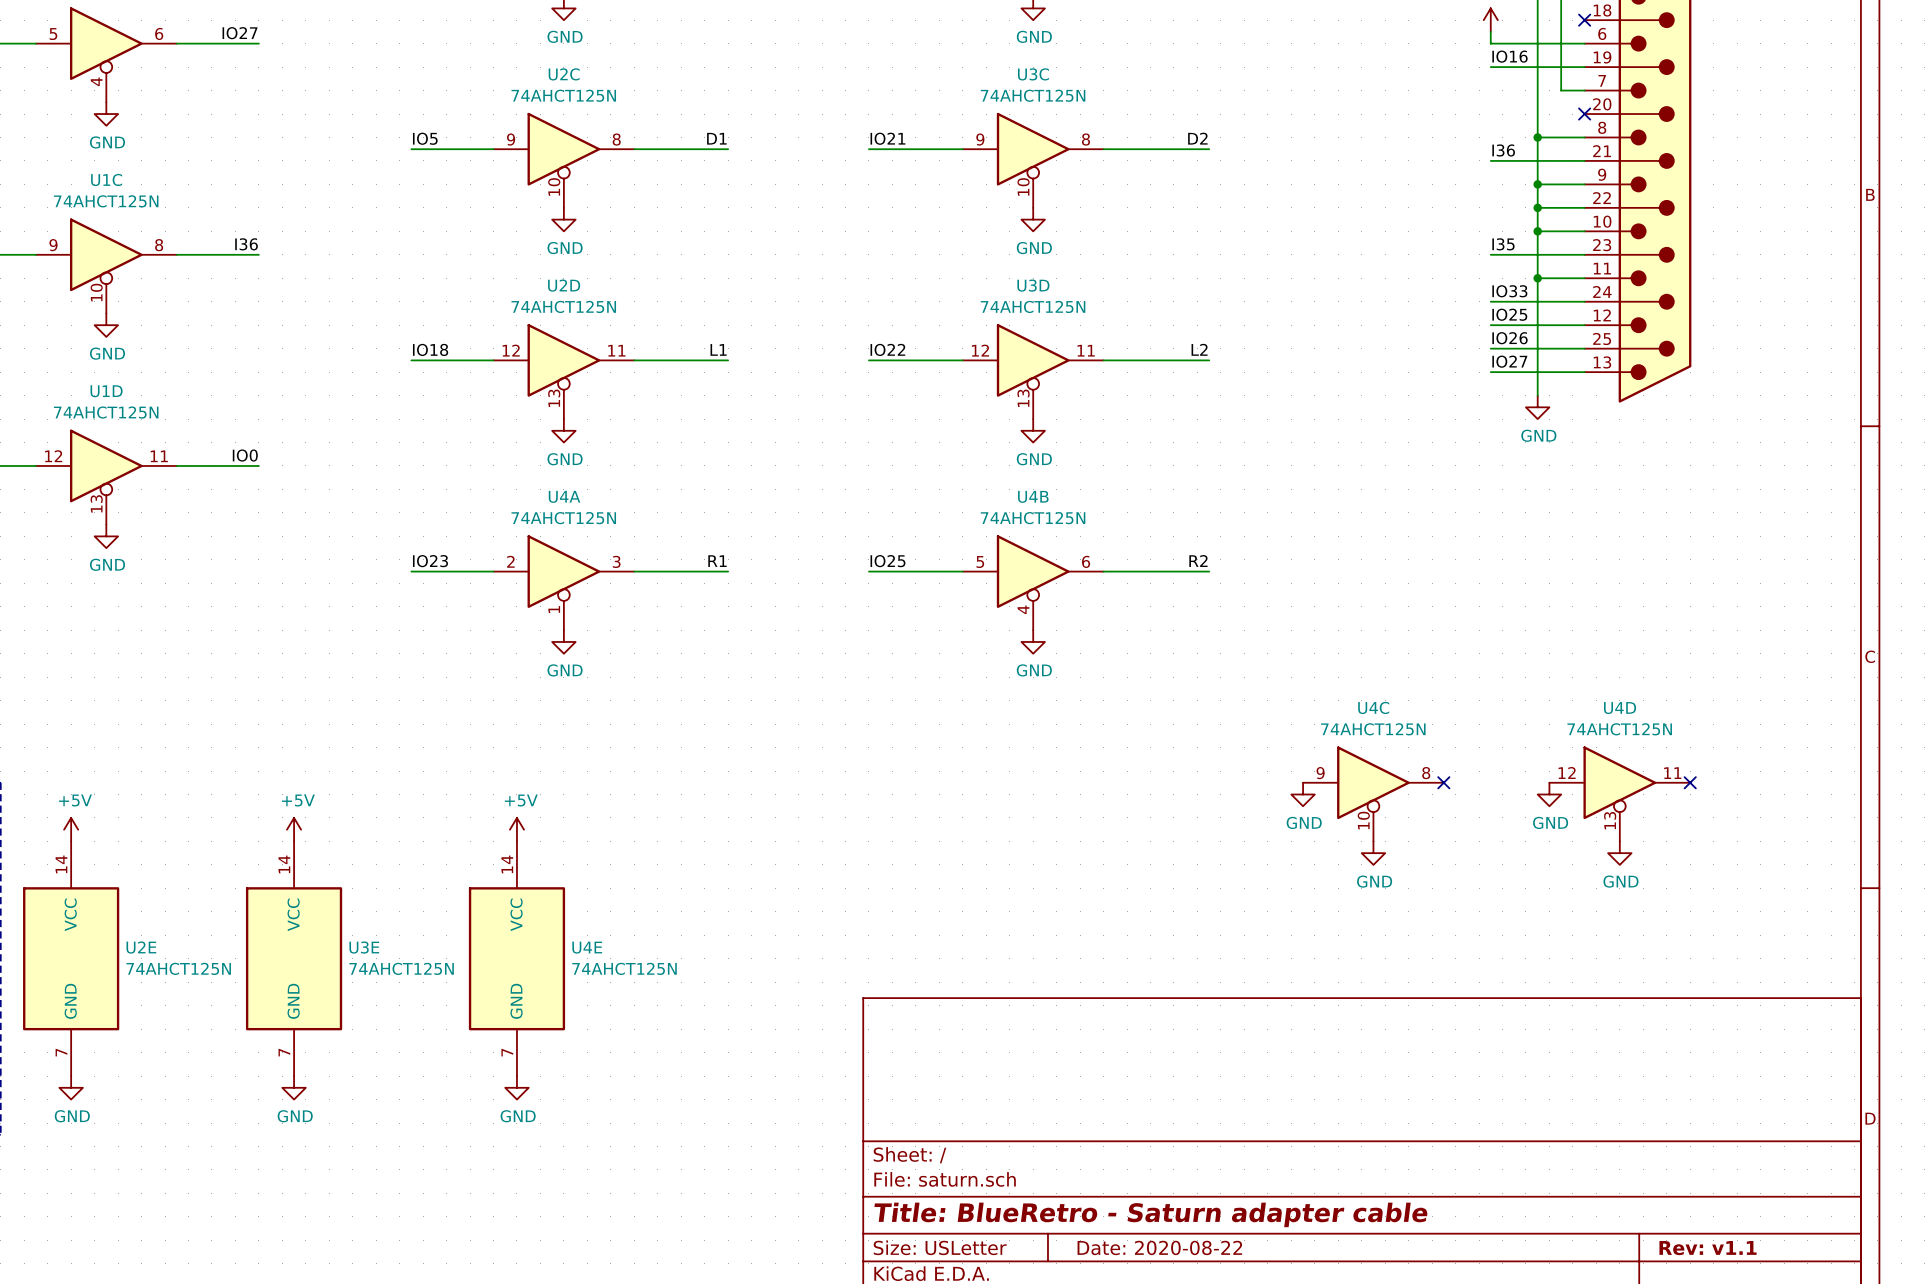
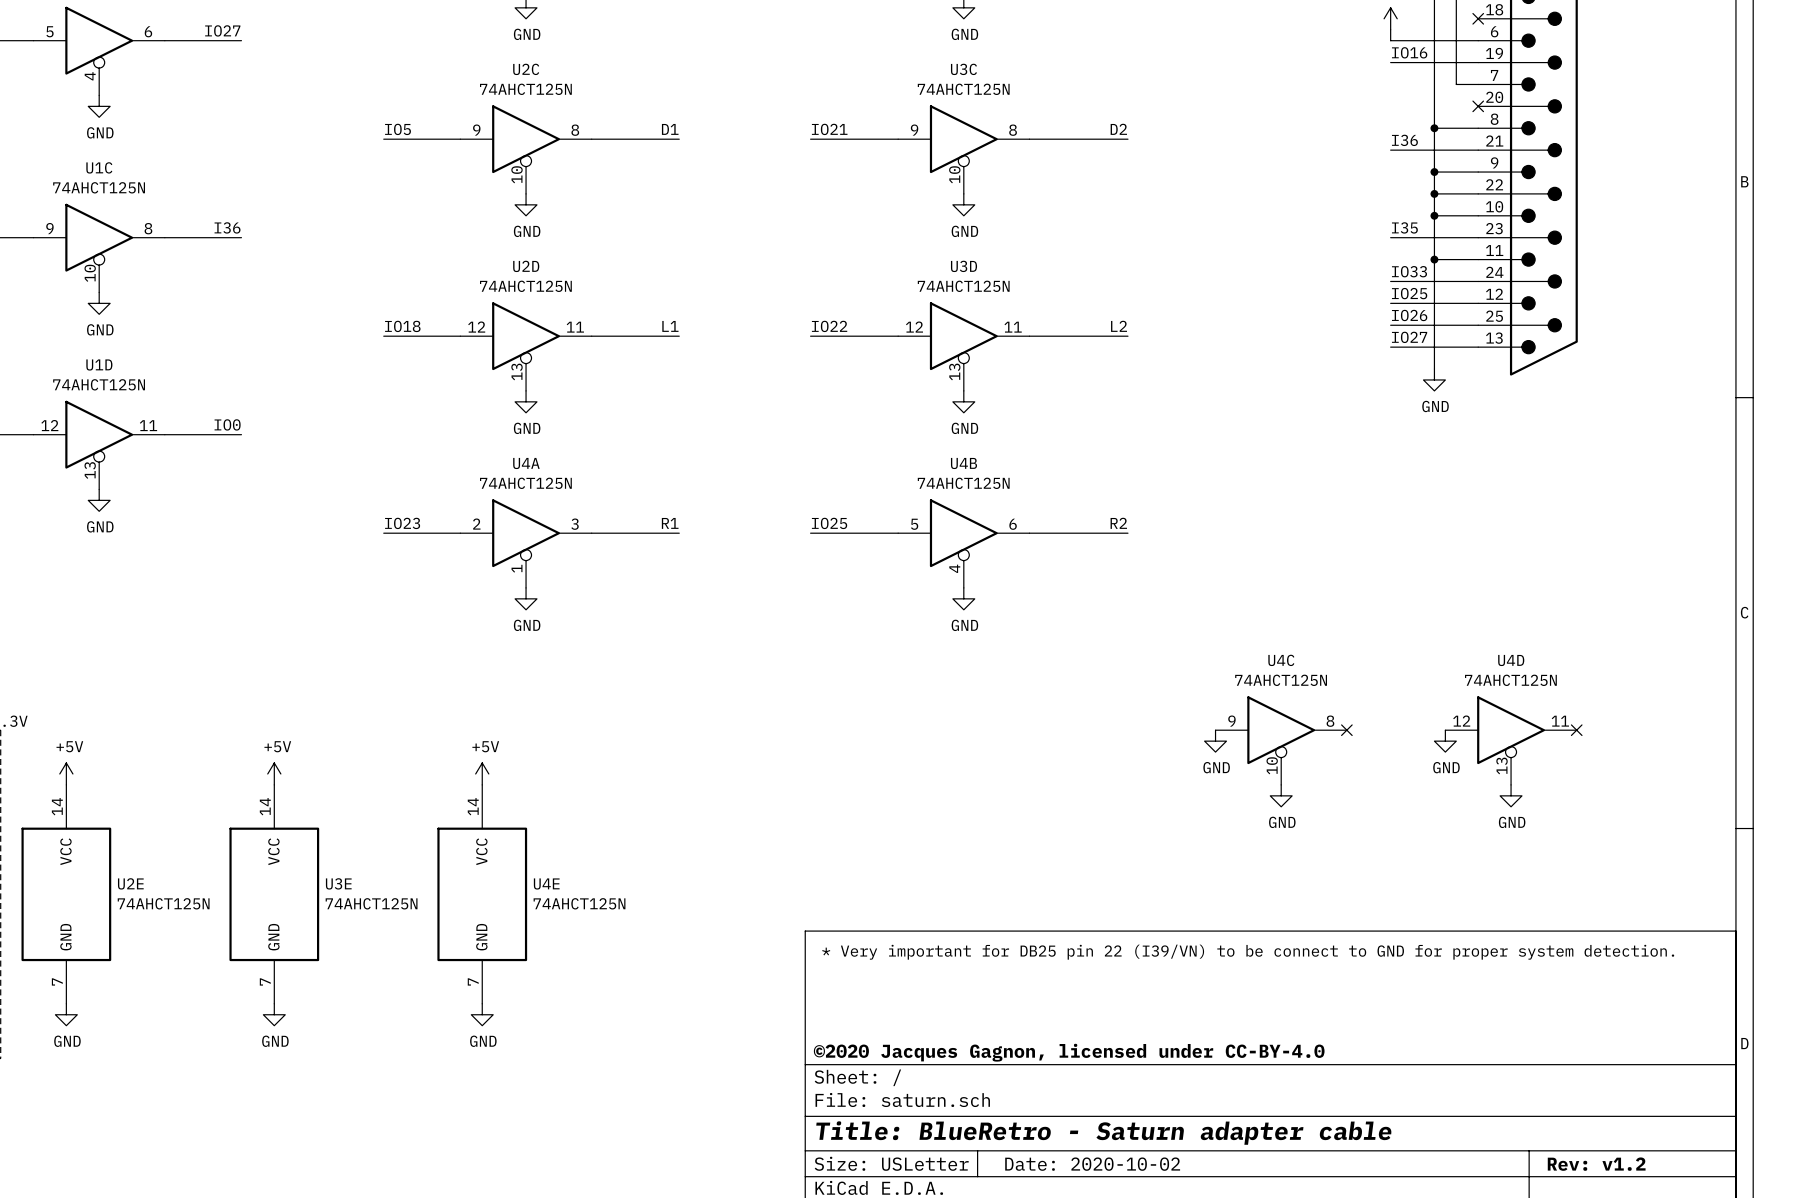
text: none -> * Very important for DB25 pin 22 (I39/VN) to be connect to GND for proper system detection. (1248, 952)
title block: none -> ©2020 Jacques Gagnon, licensed under CC-BY-4.0 (1069, 1052)
title block: Date: 2020-08-22 (1159, 1247) -> Date: 2020-10-02 (1092, 1164)
title block: Rev: v1.1 (1708, 1248) -> Rev: v1.2 (1596, 1164)

